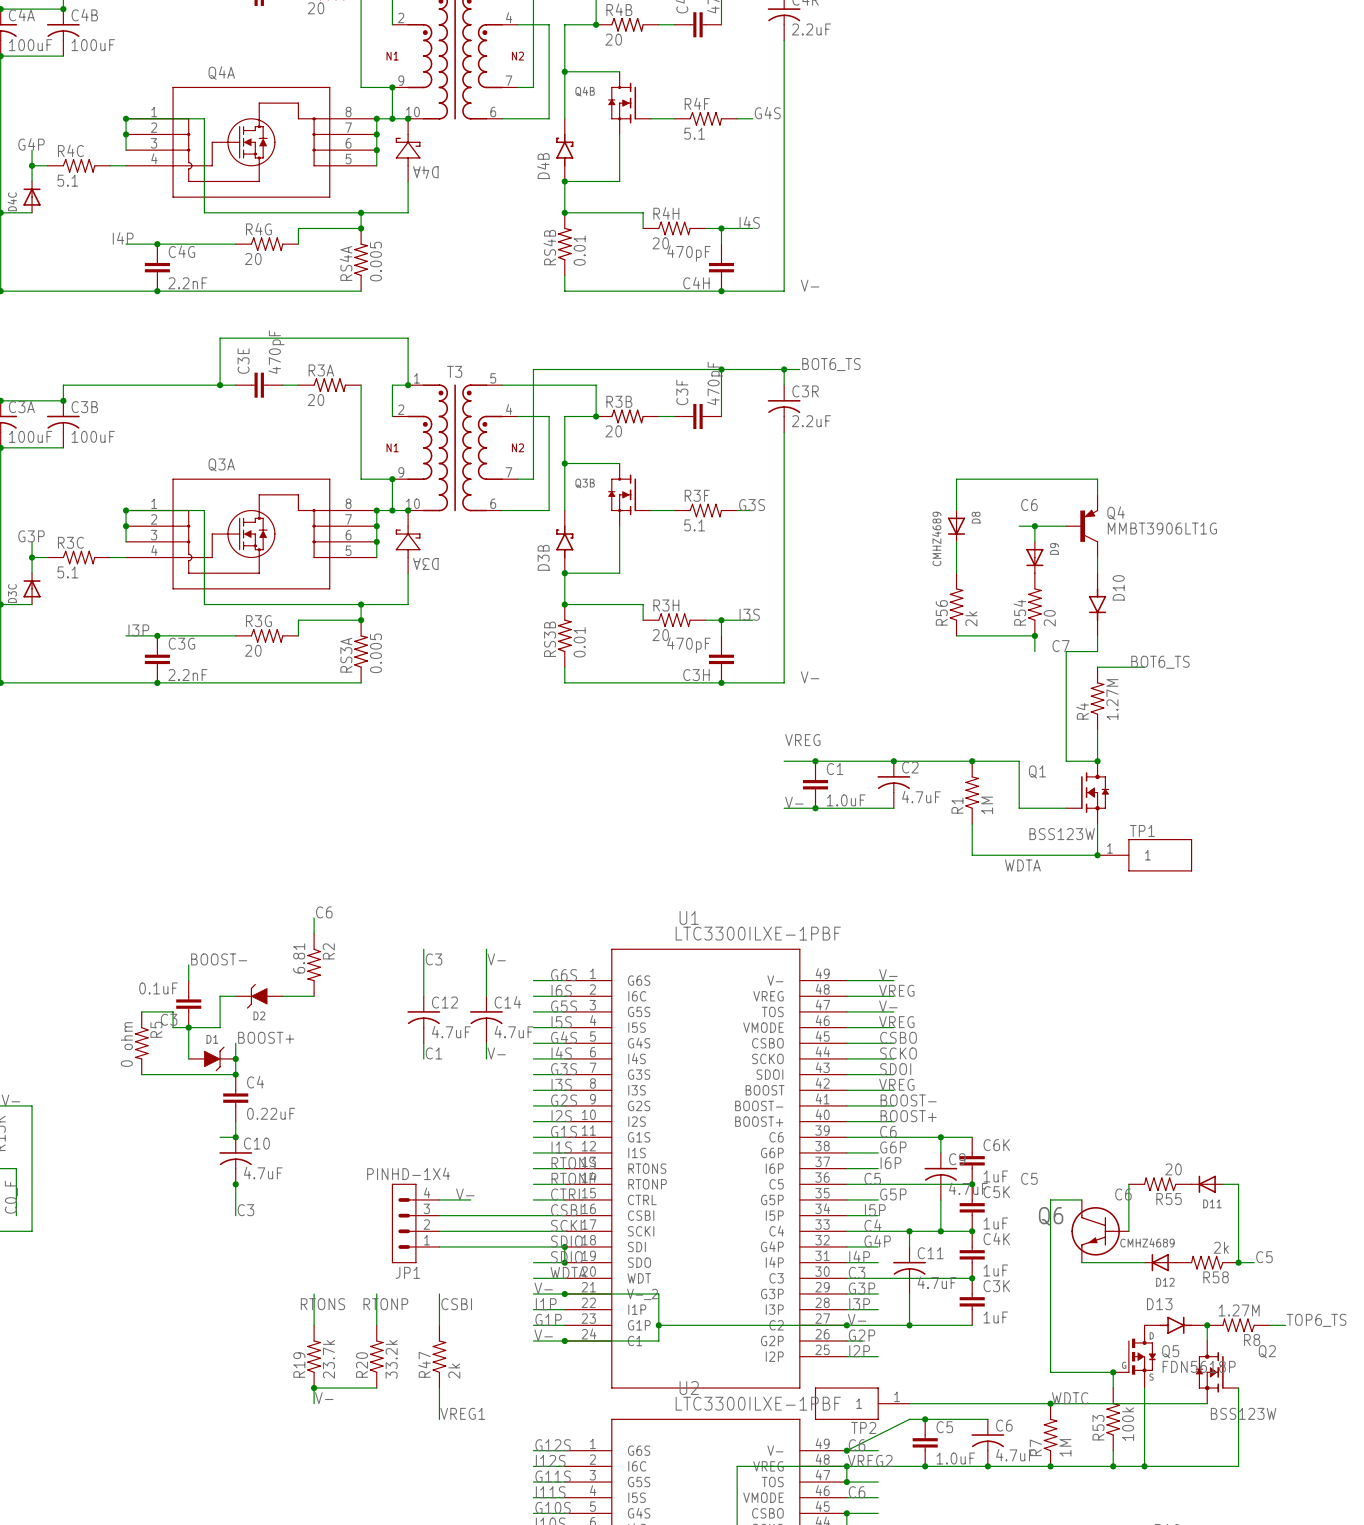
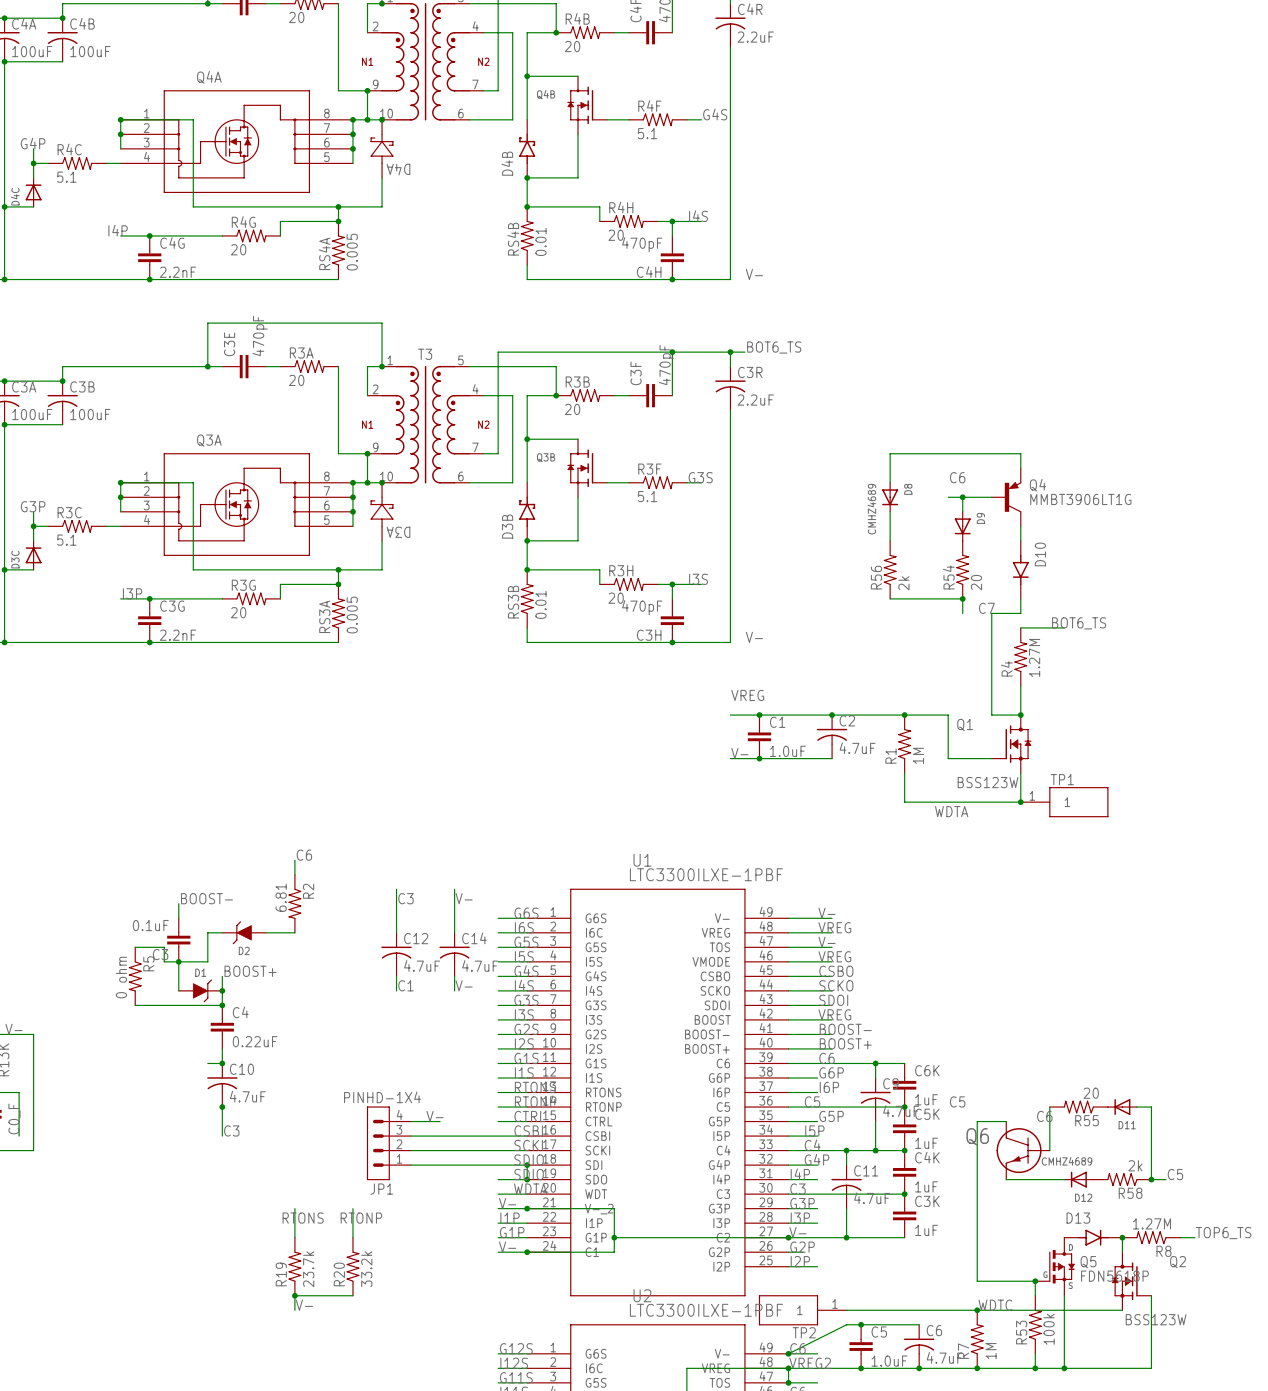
wire: (439, 1293) (439, 1325) -> none
label: CSBI (456, 1304) -> none
R47: 2k (439, 1356) -> none
wire: (439, 1388) (439, 1419) -> none
label: VREG1 (462, 1413) -> none

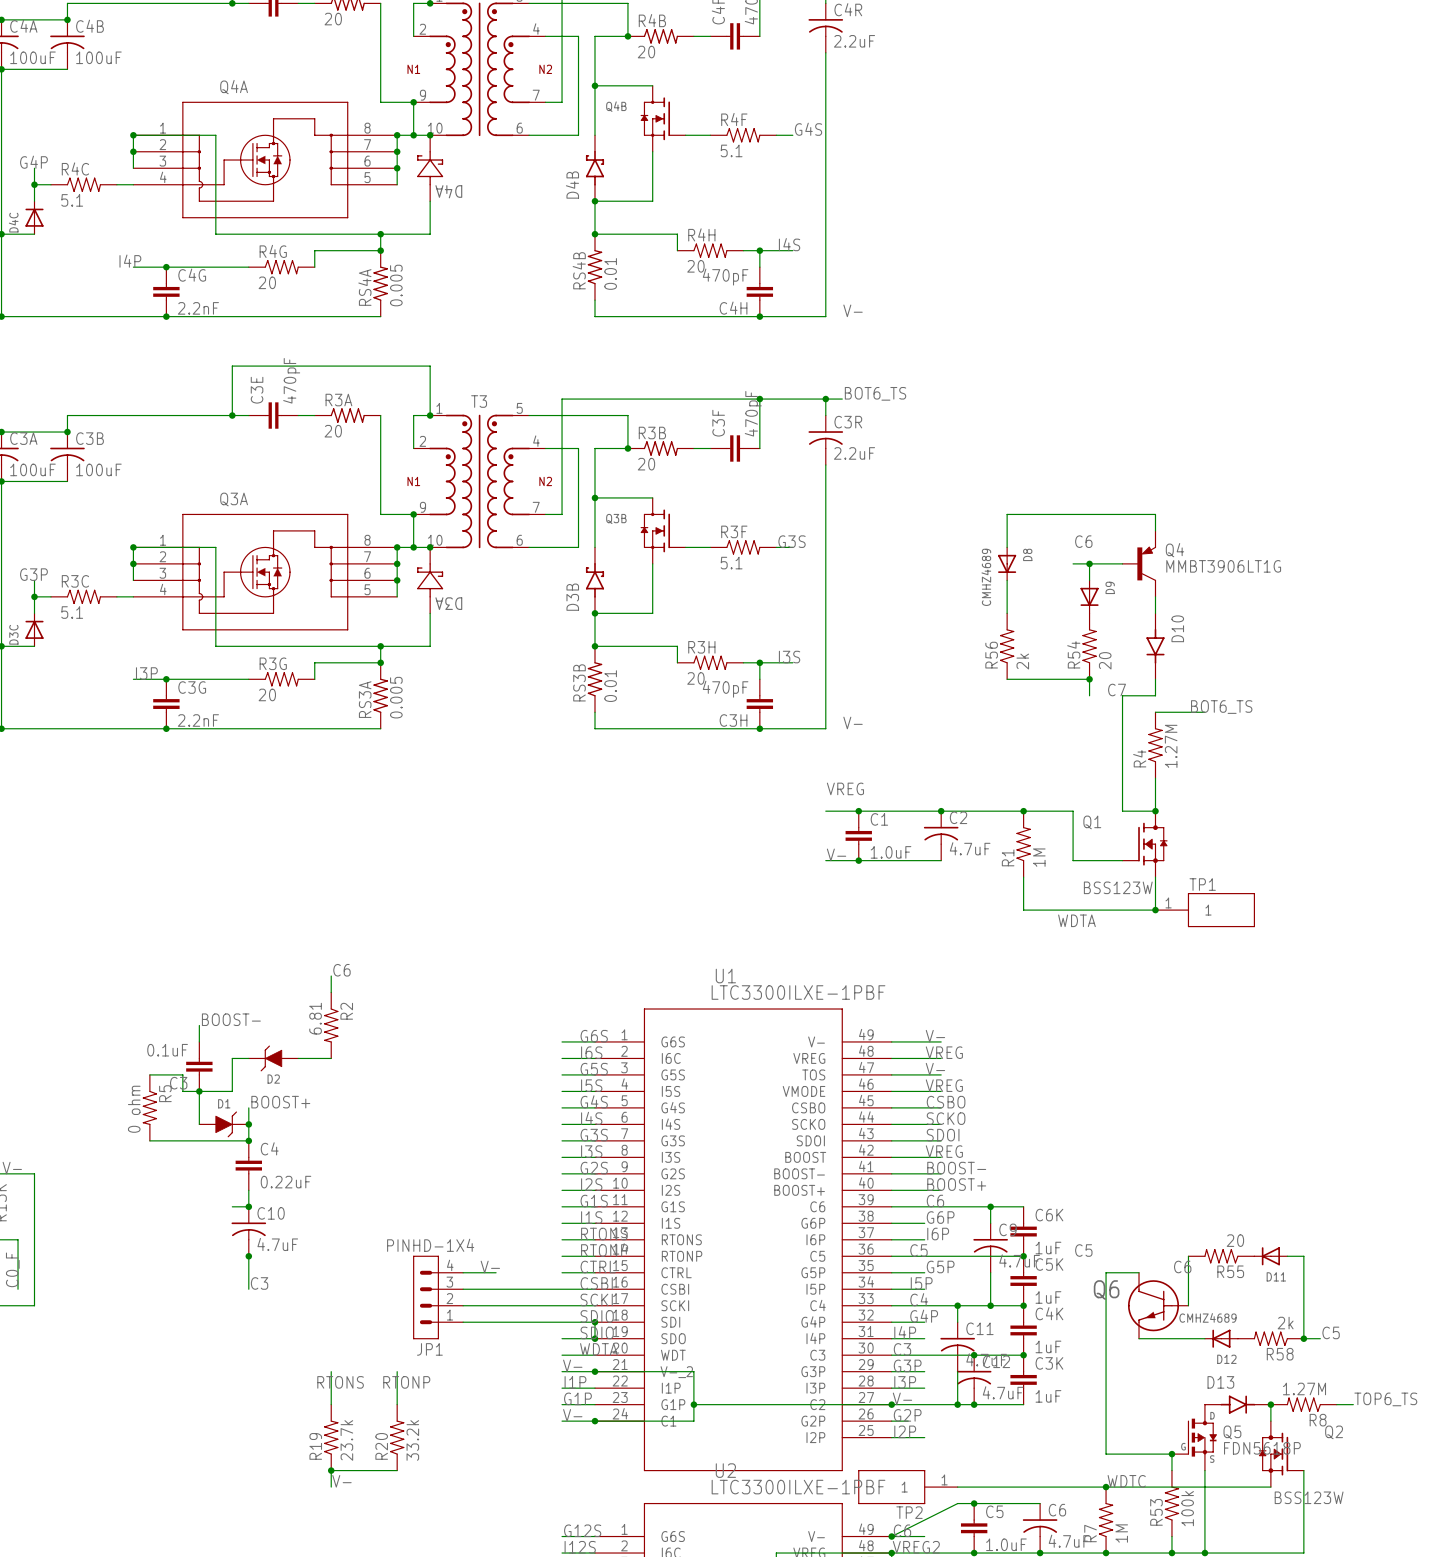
wire: (396, 889) (396, 932) -> none
wire: (454, 889) (454, 932) -> none
label: C3 (406, 898) -> none
label: V- (464, 898) -> none
C12 position: (396, 954) -> (974, 1379)
C14: 4.7uF (454, 954) -> none
wire: (396, 976) (396, 990) -> none
wire: (454, 976) (454, 990) -> none
label: C1 (406, 985) -> none
label: V- (464, 985) -> none
junction: none -> (974, 1355)
junction: none -> (974, 1404)

